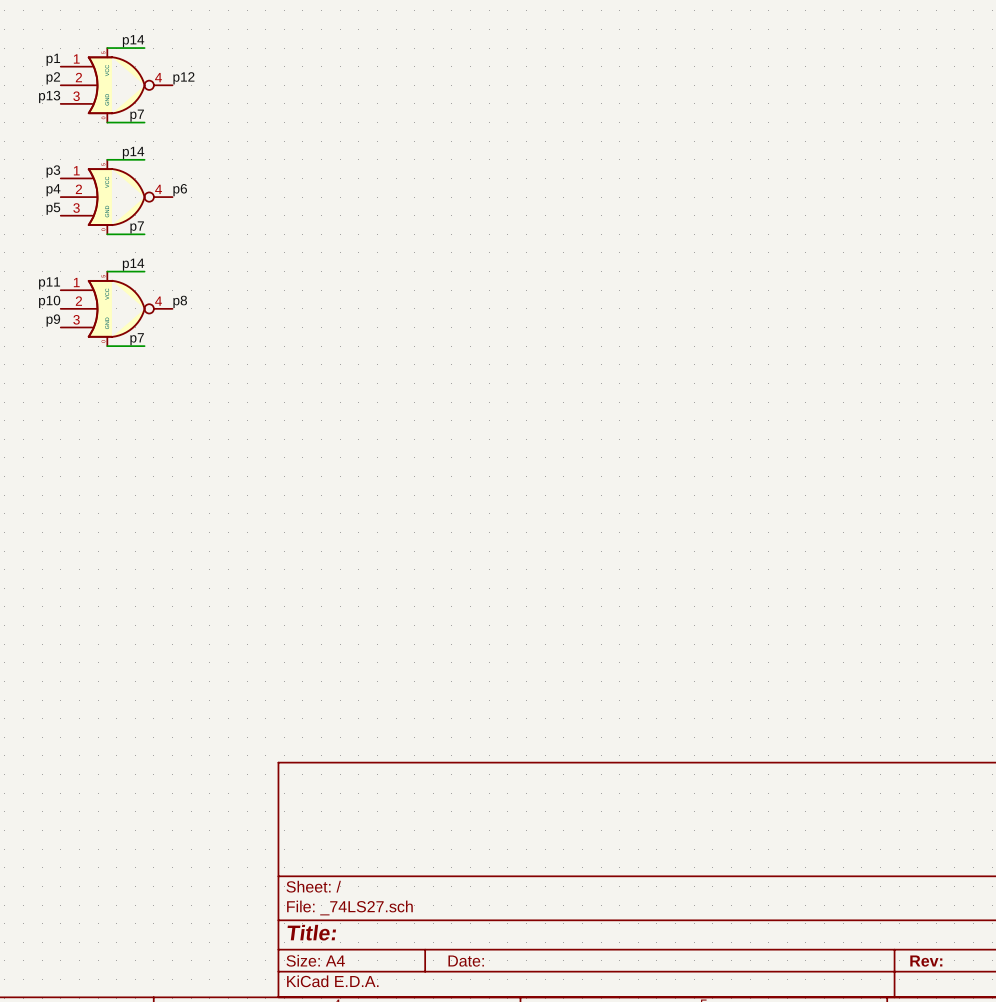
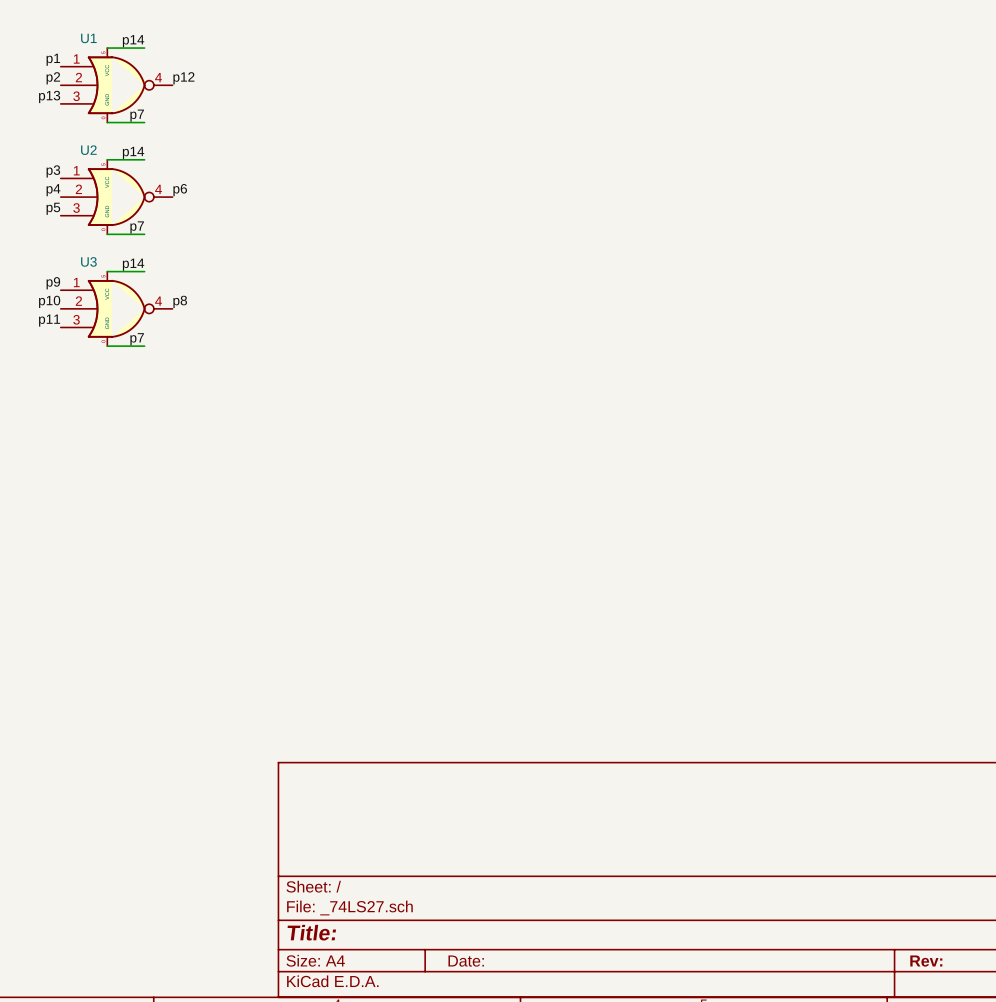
U1 name: none -> U1 (88, 38)
U2 name: none -> U2 (88, 150)
U3 name: none -> U3 (88, 261)
label: p11 (49, 283) -> p9 (53, 283)
label: p9 (53, 320) -> p11 (49, 320)

